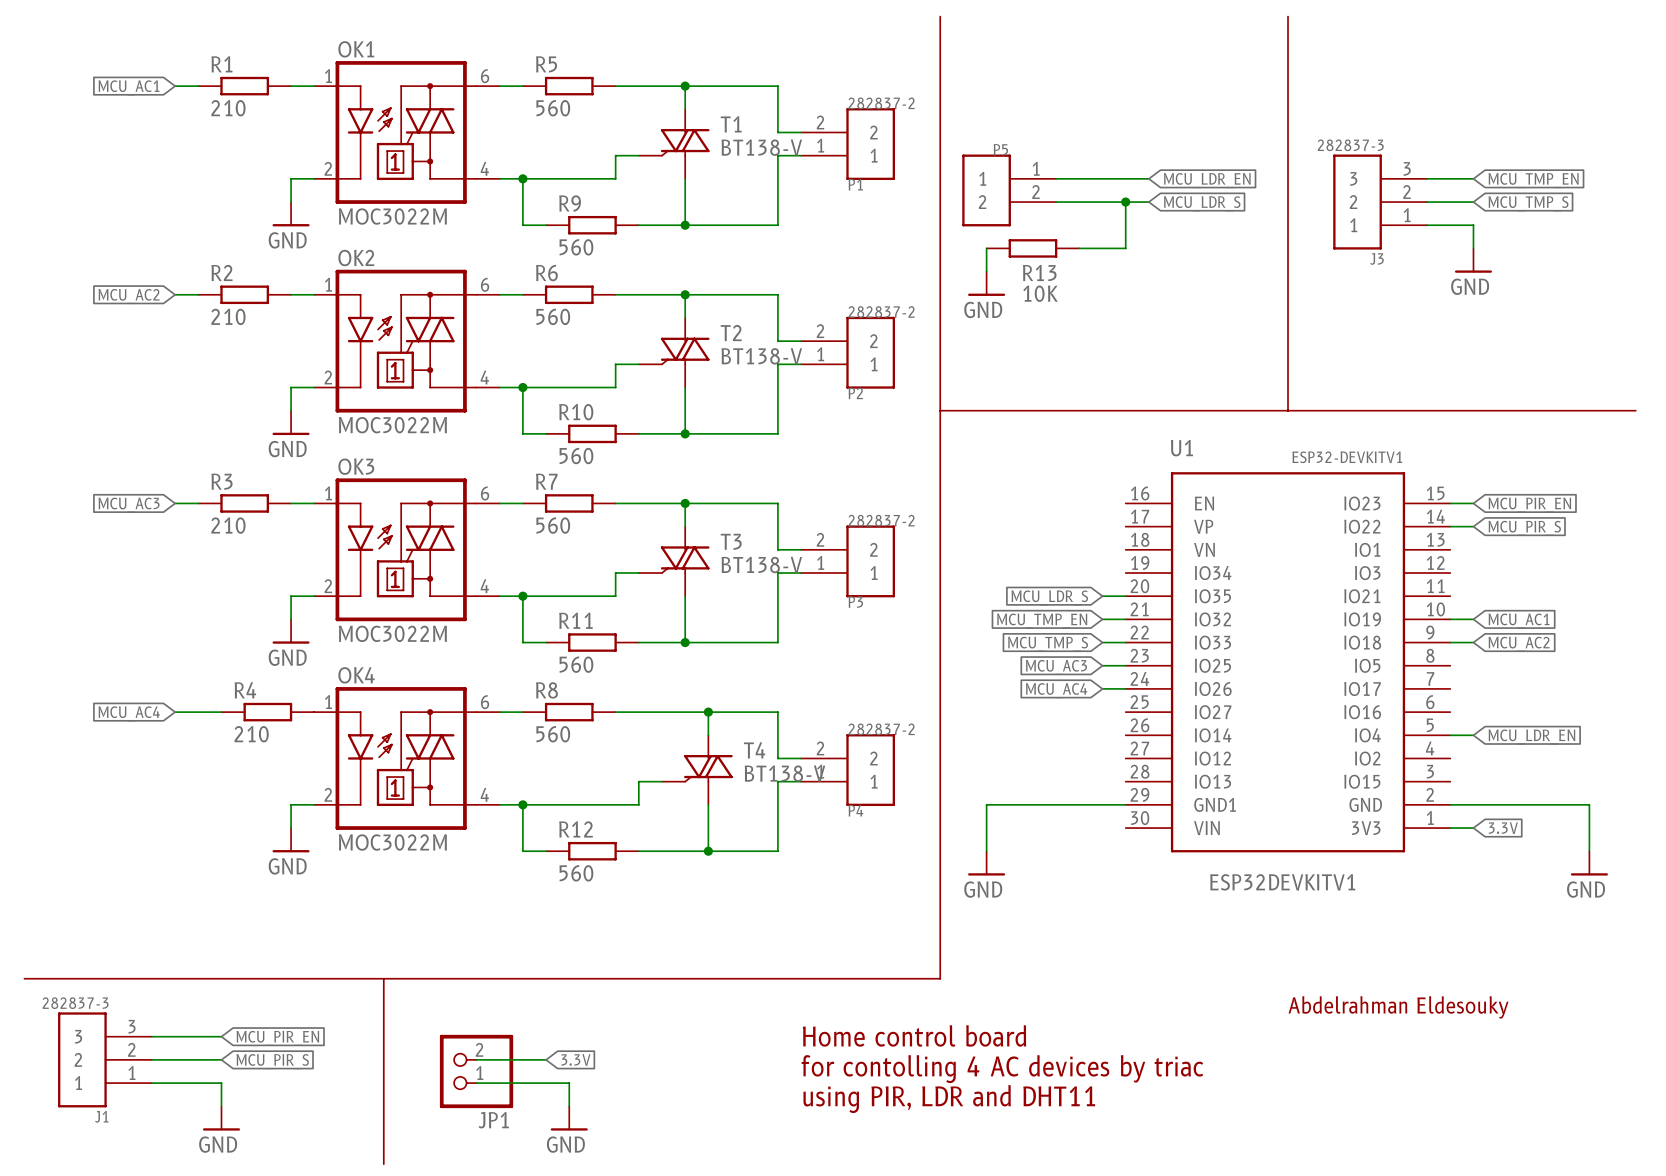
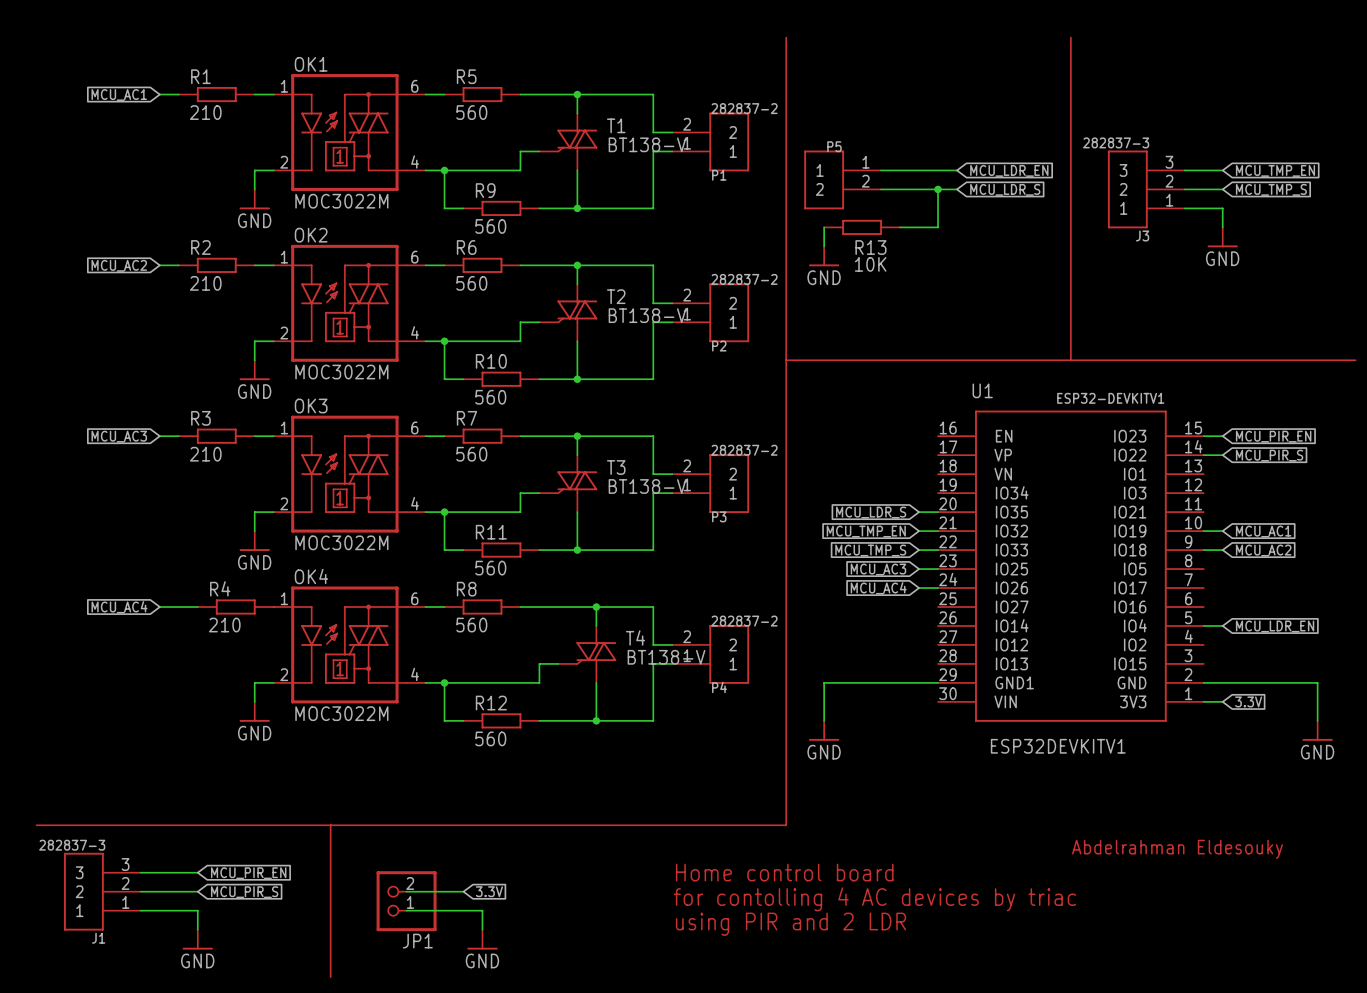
text: using PIR, LDR and DHT11 (949, 1099) -> using PIR and 2 LDR (791, 924)

